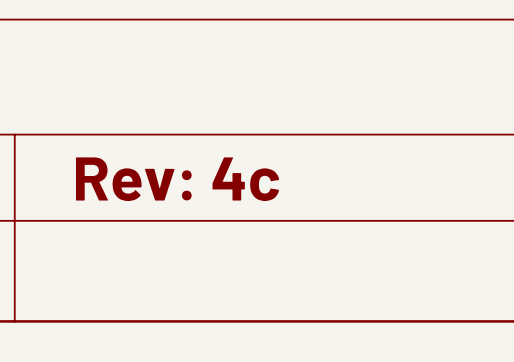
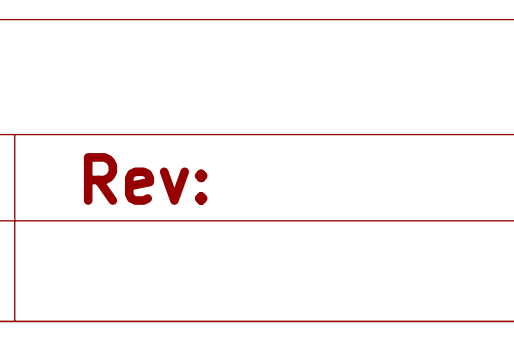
title block: Rev: 4c (177, 179) -> Rev: (145, 178)

